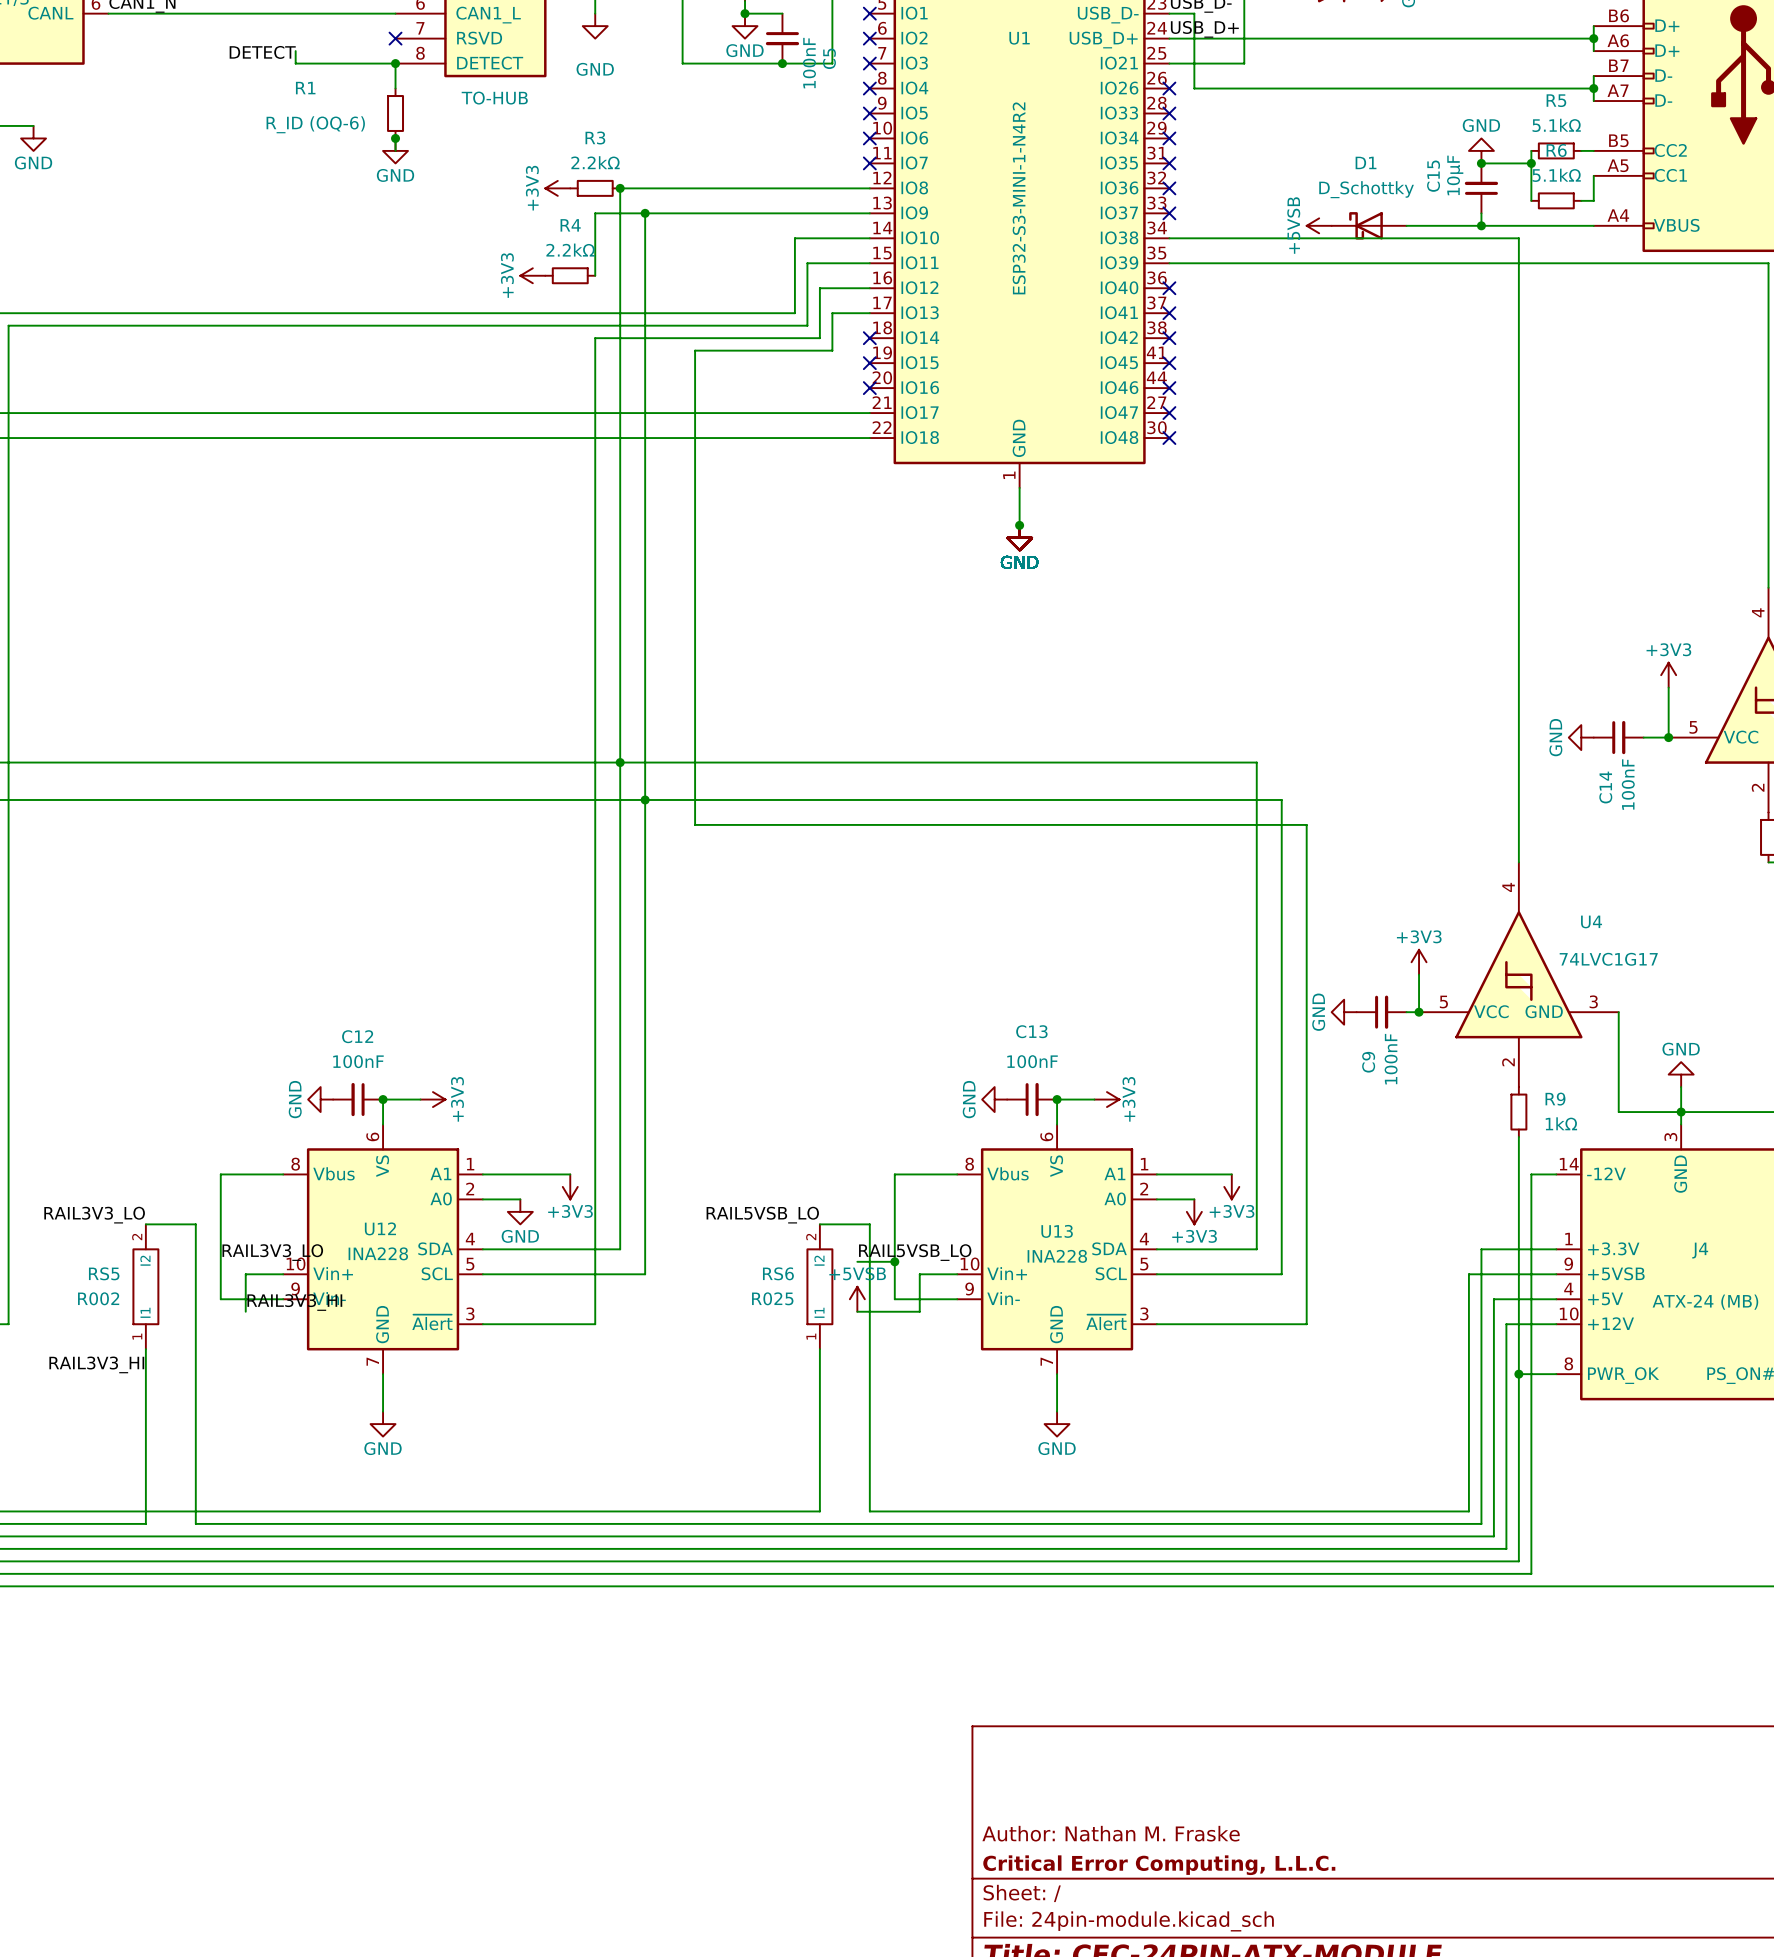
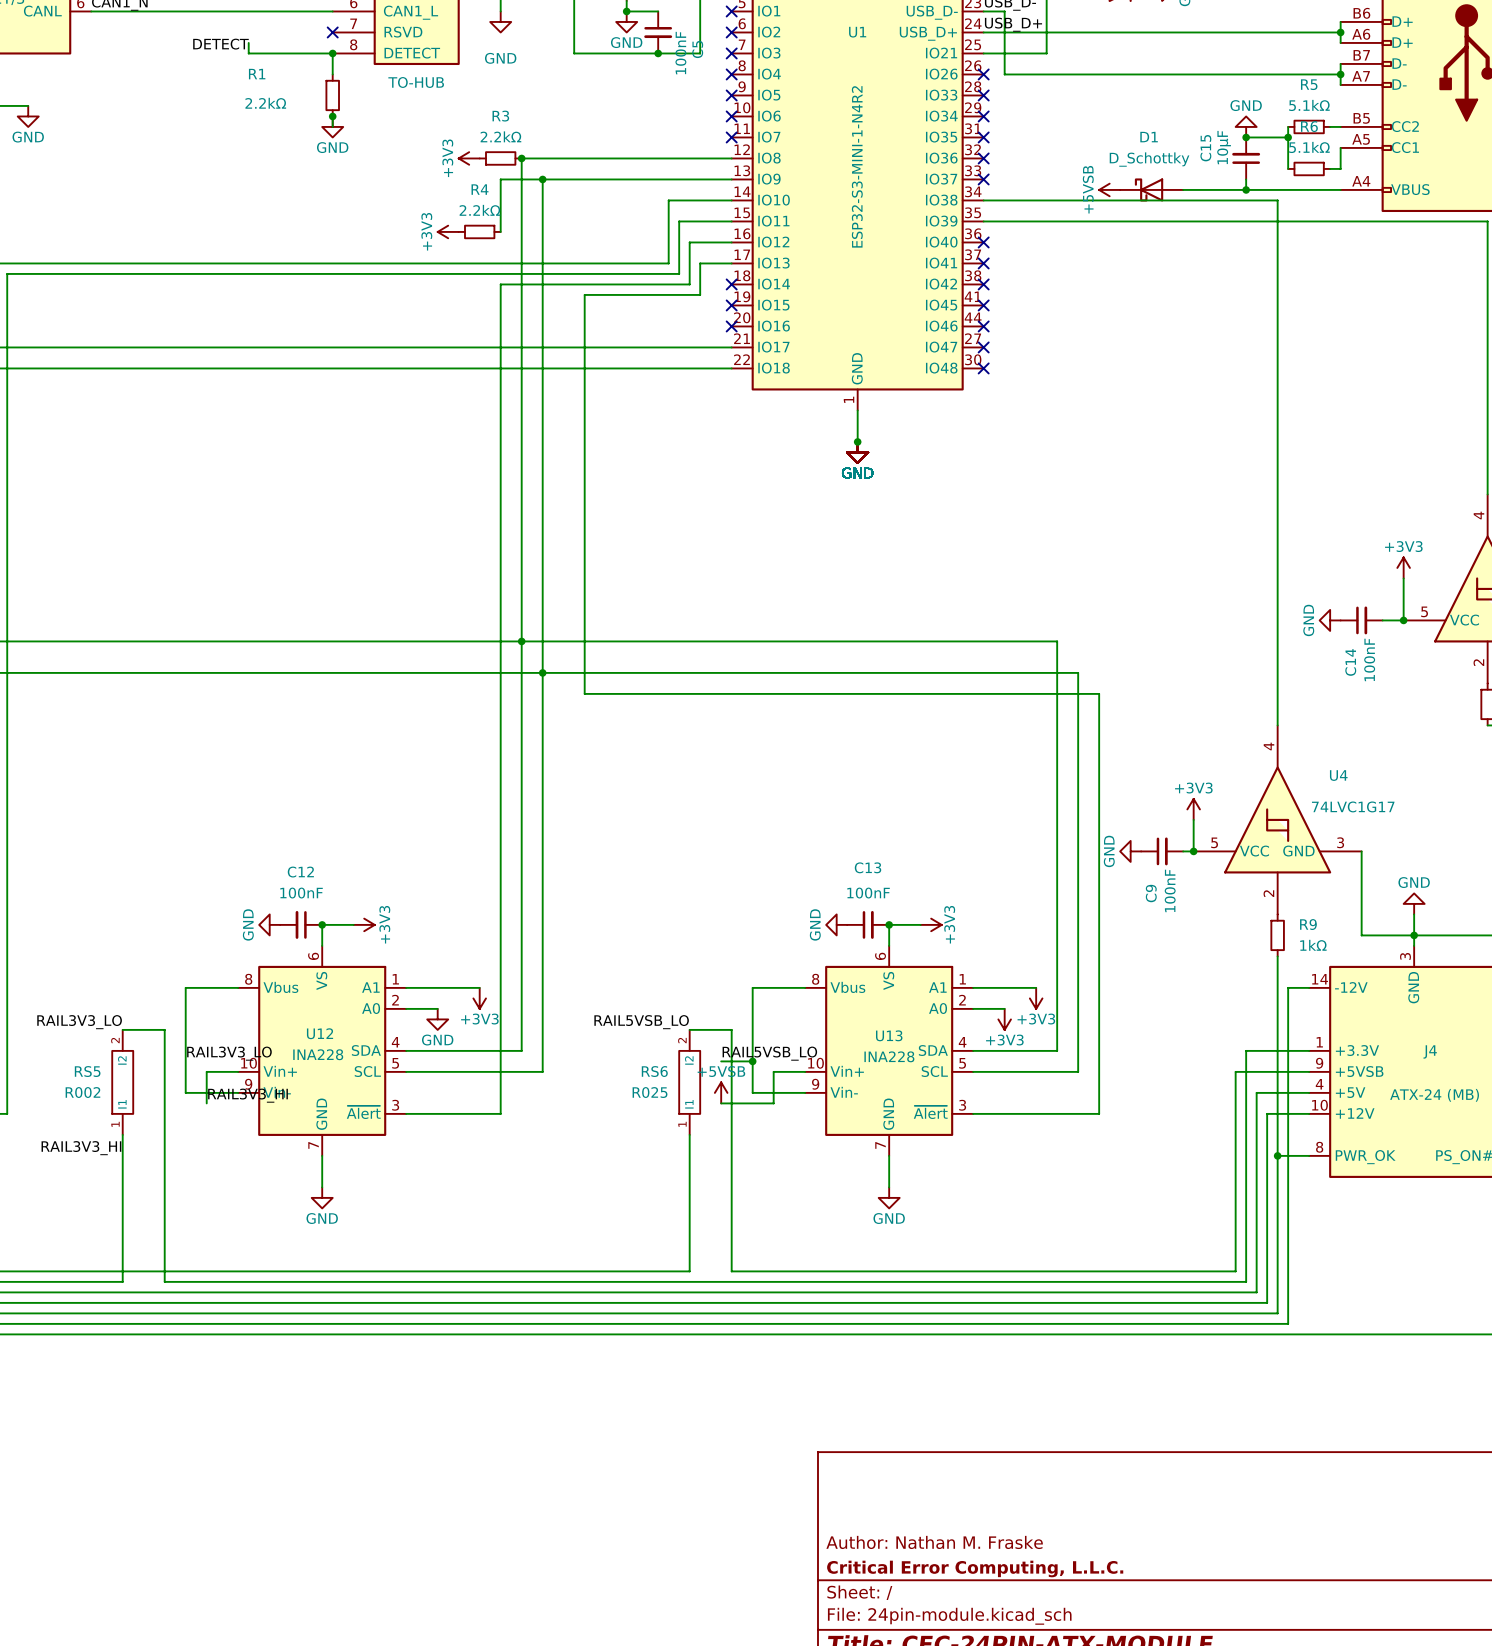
R1 value: R_ID (OQ-6) (315, 124) -> 2.2kΩ (265, 103)

